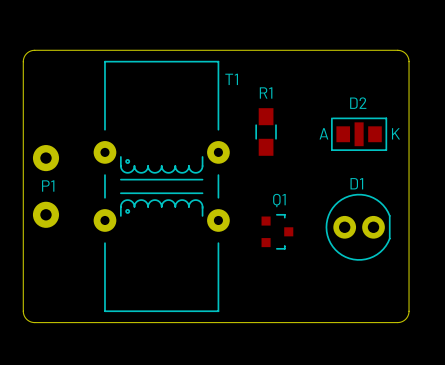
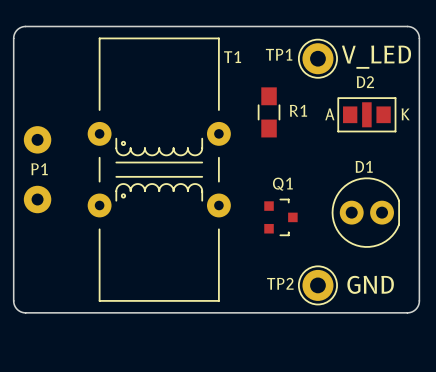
text: none -> V_LED (376, 57)
TP1: none -> (317, 58)
R1 name position: R1 (266, 92) -> R1 (298, 110)
text: none -> GND (370, 284)
TP2: none -> (317, 285)

